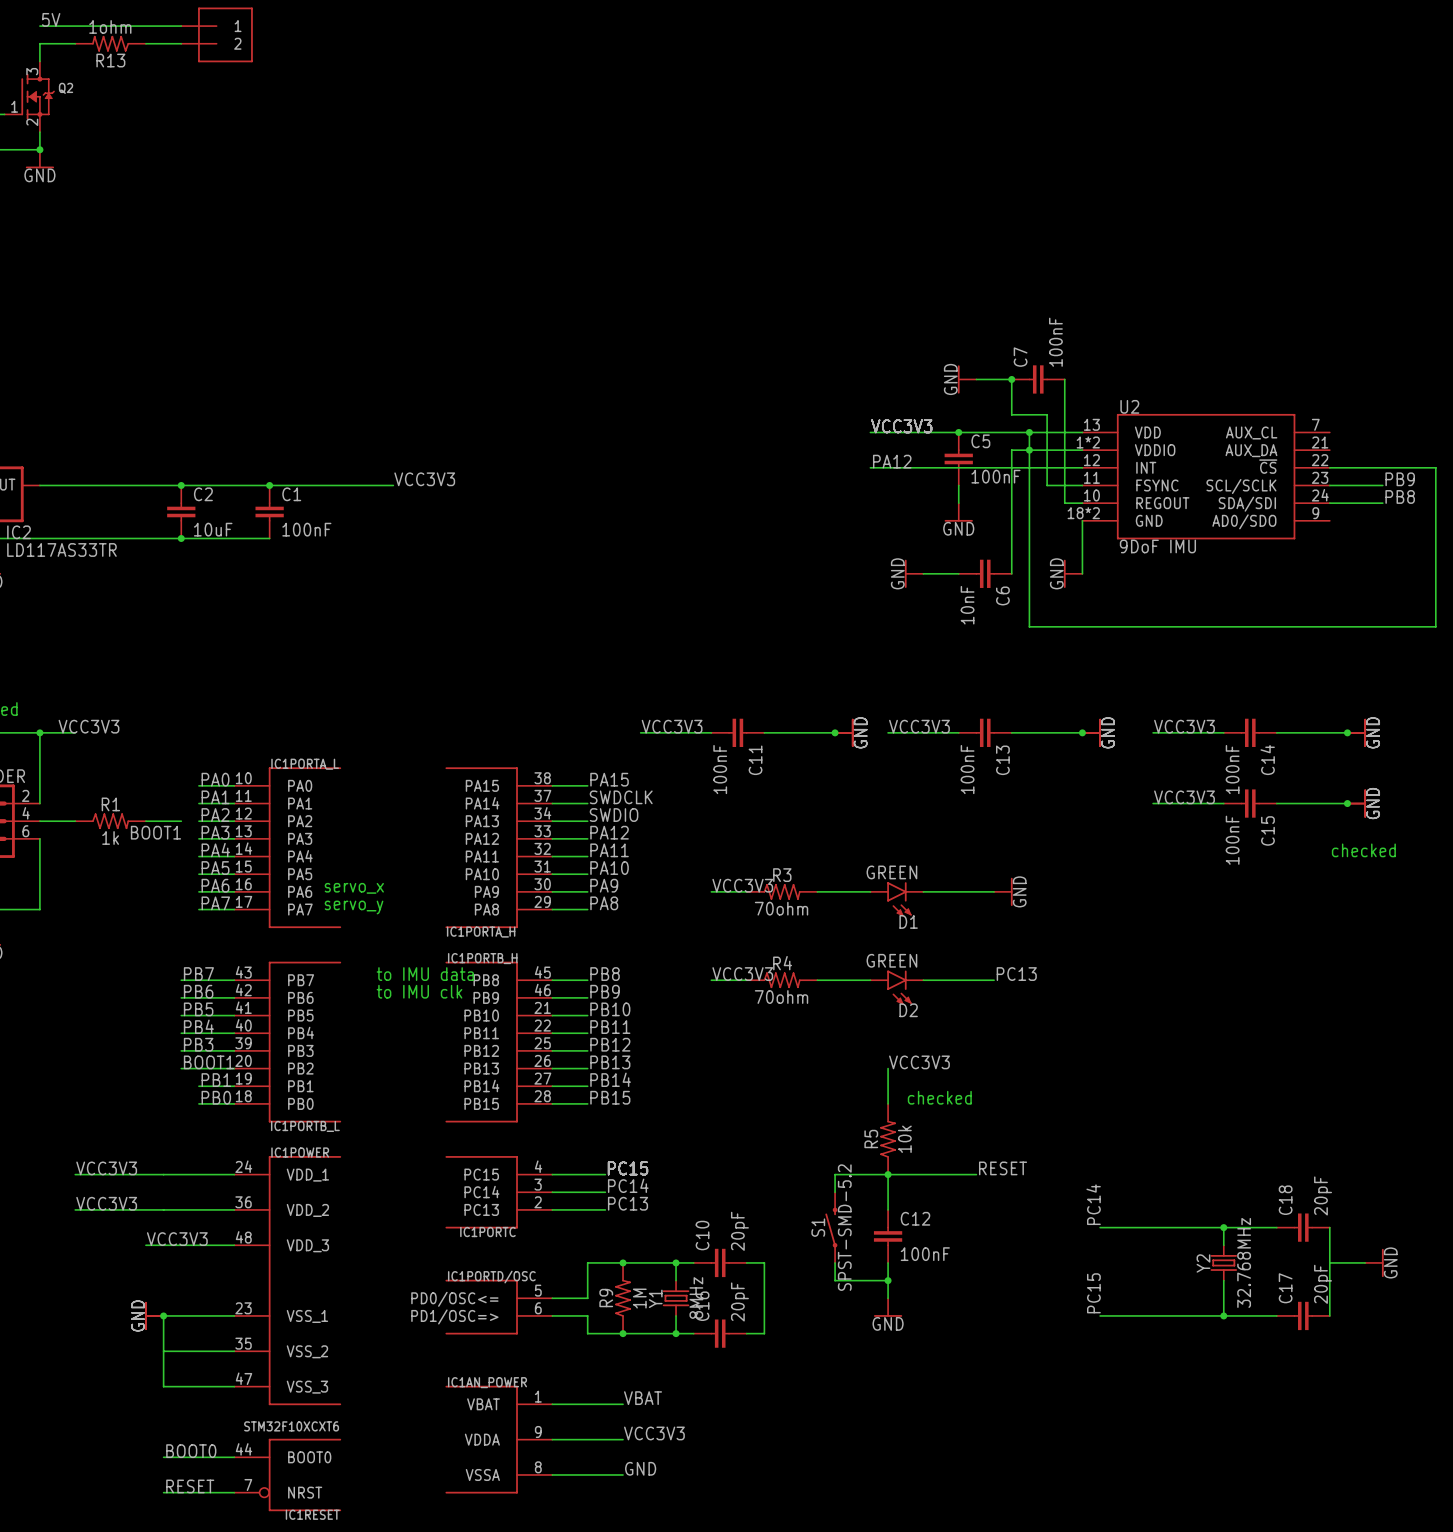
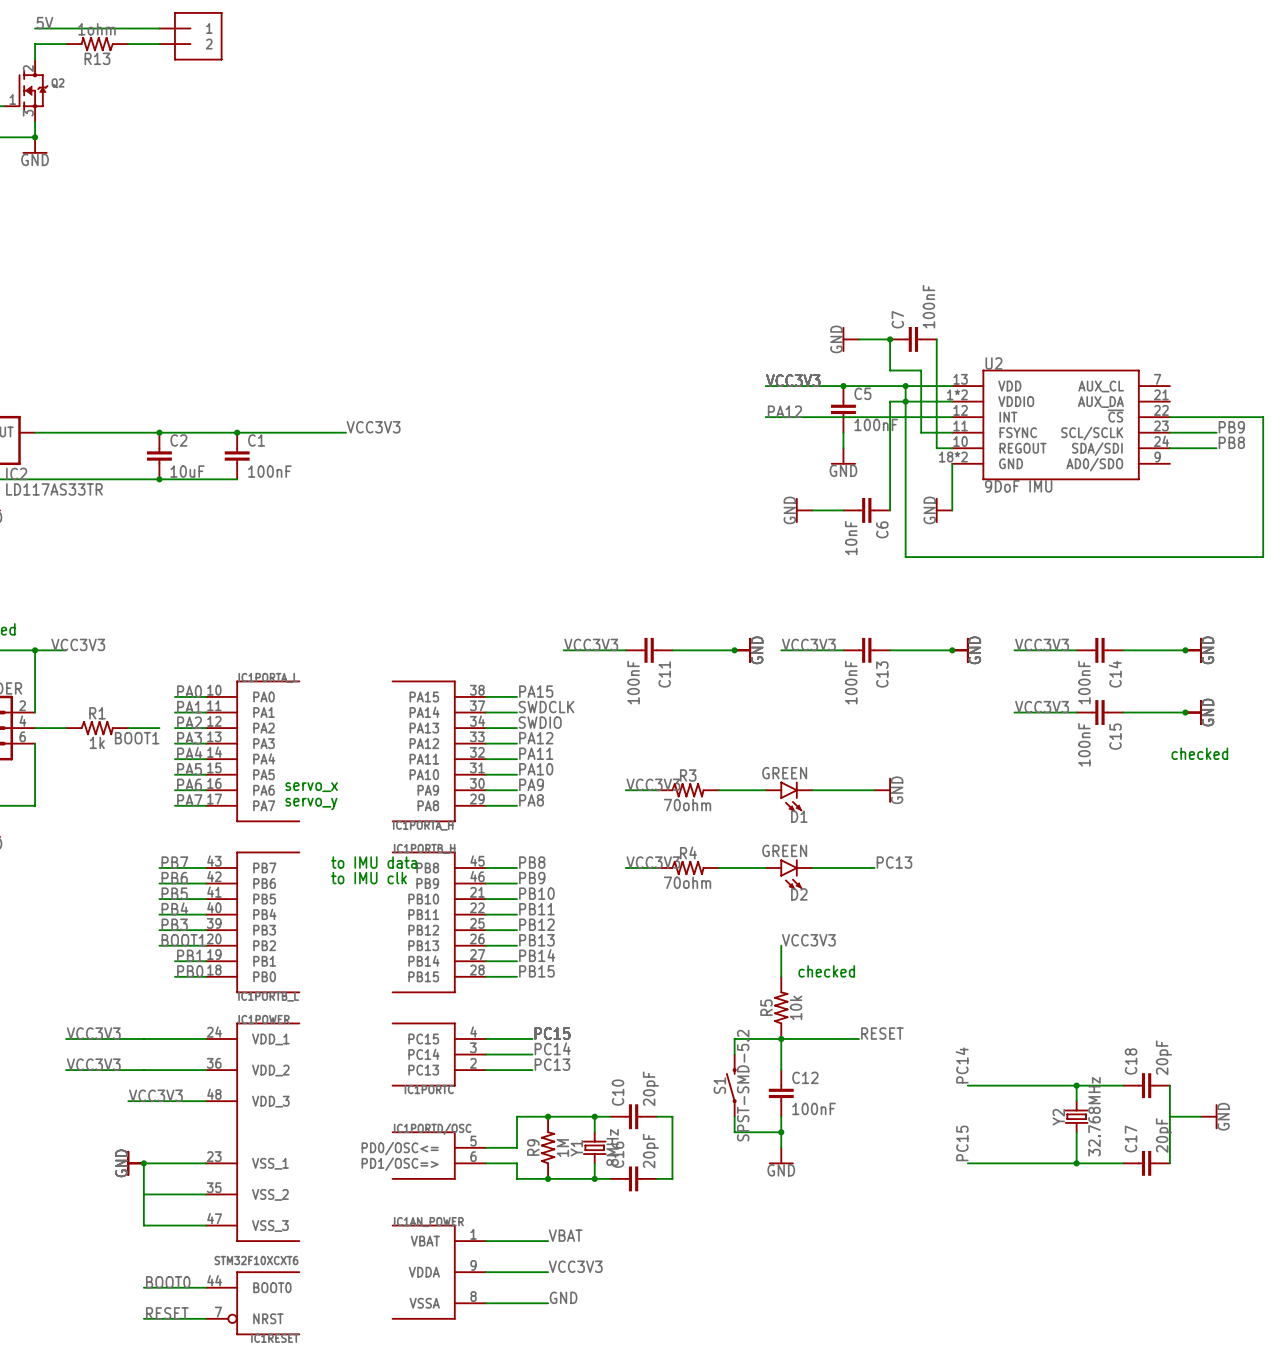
Q2 pin number: 3 (32, 71) -> 2 (28, 68)
Q2 pin number: 2 (32, 122) -> 3 (28, 113)

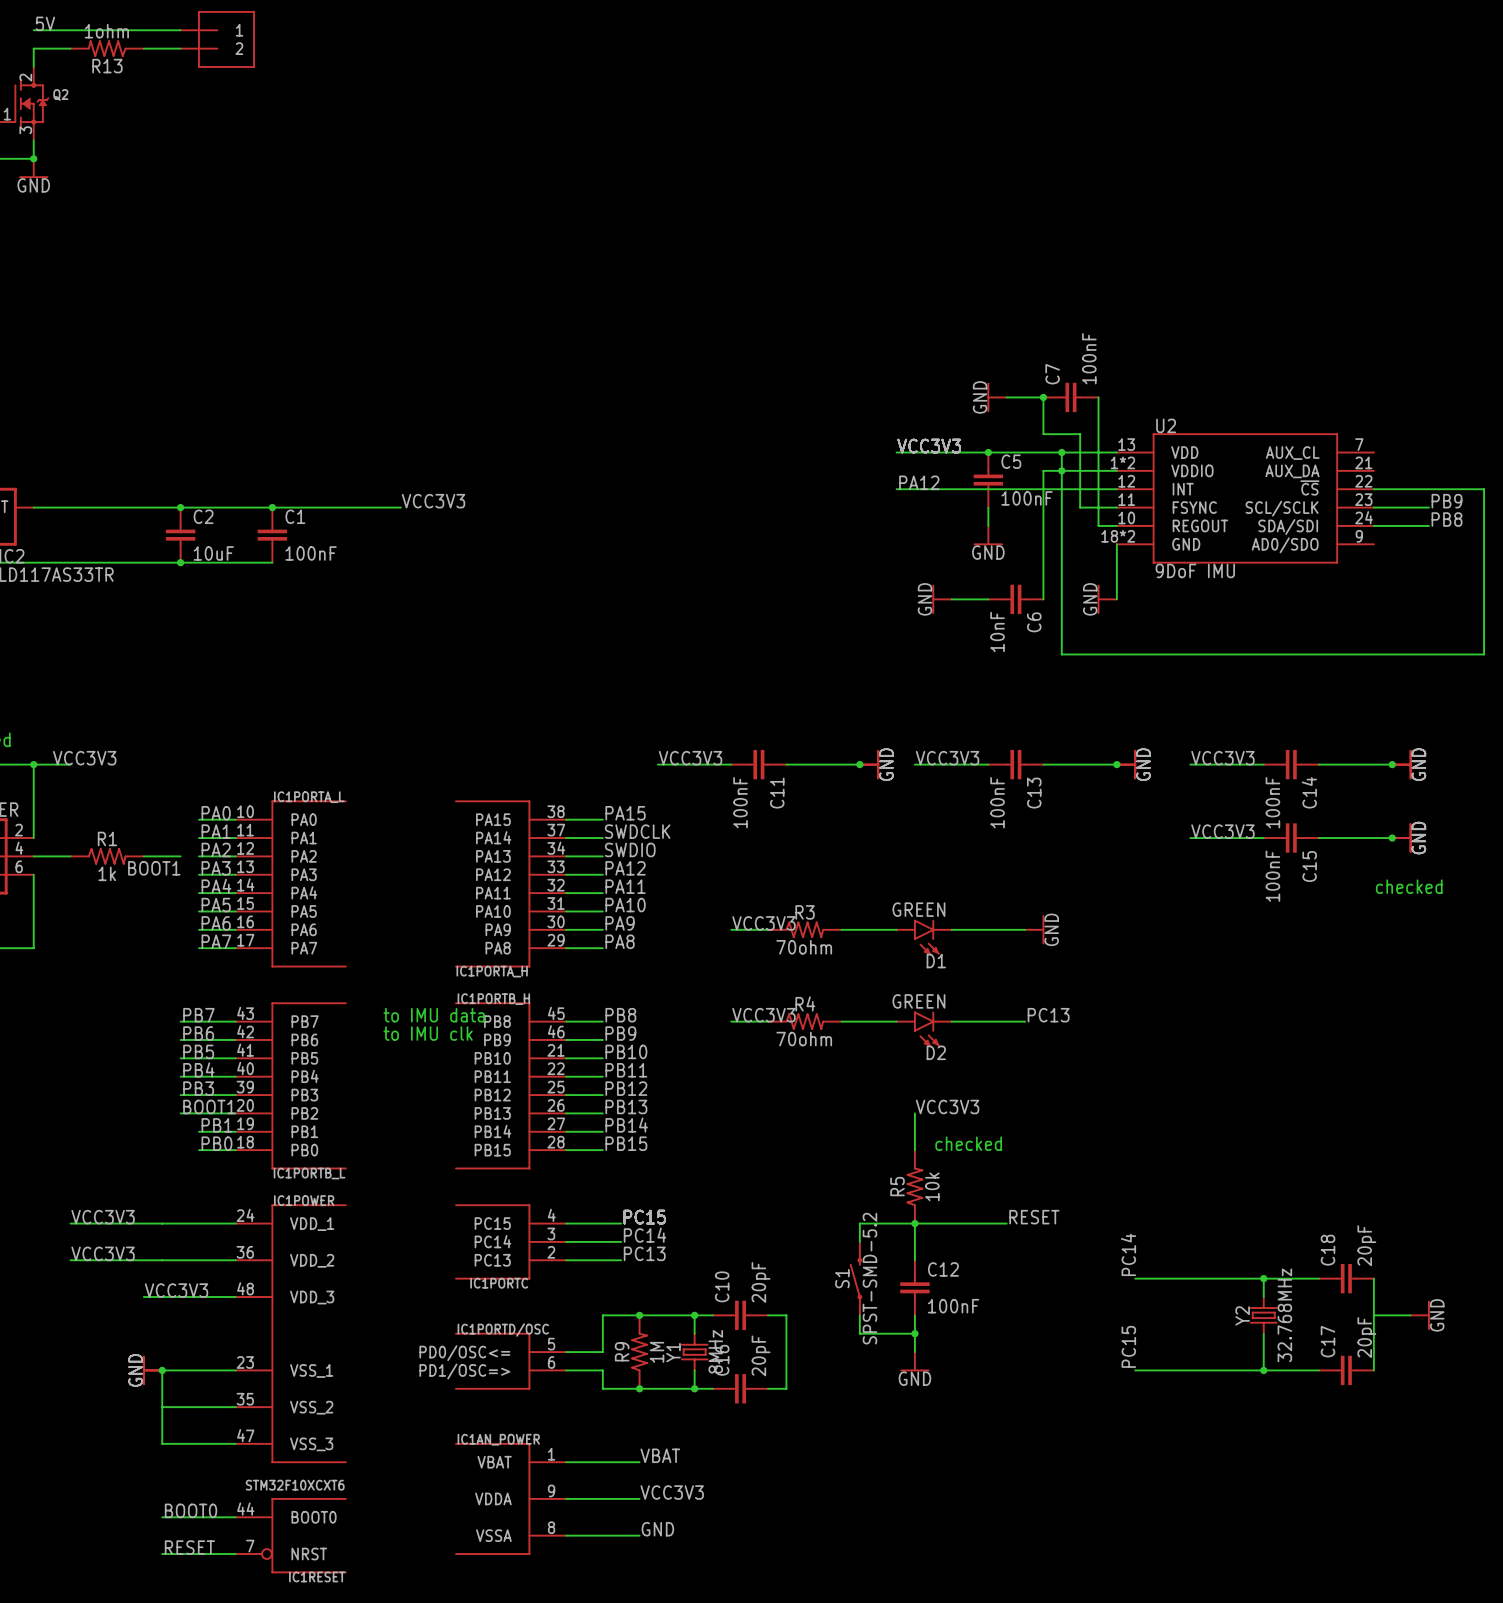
text: servo_x (311, 787) -> none
text: servo_y (311, 803) -> none

